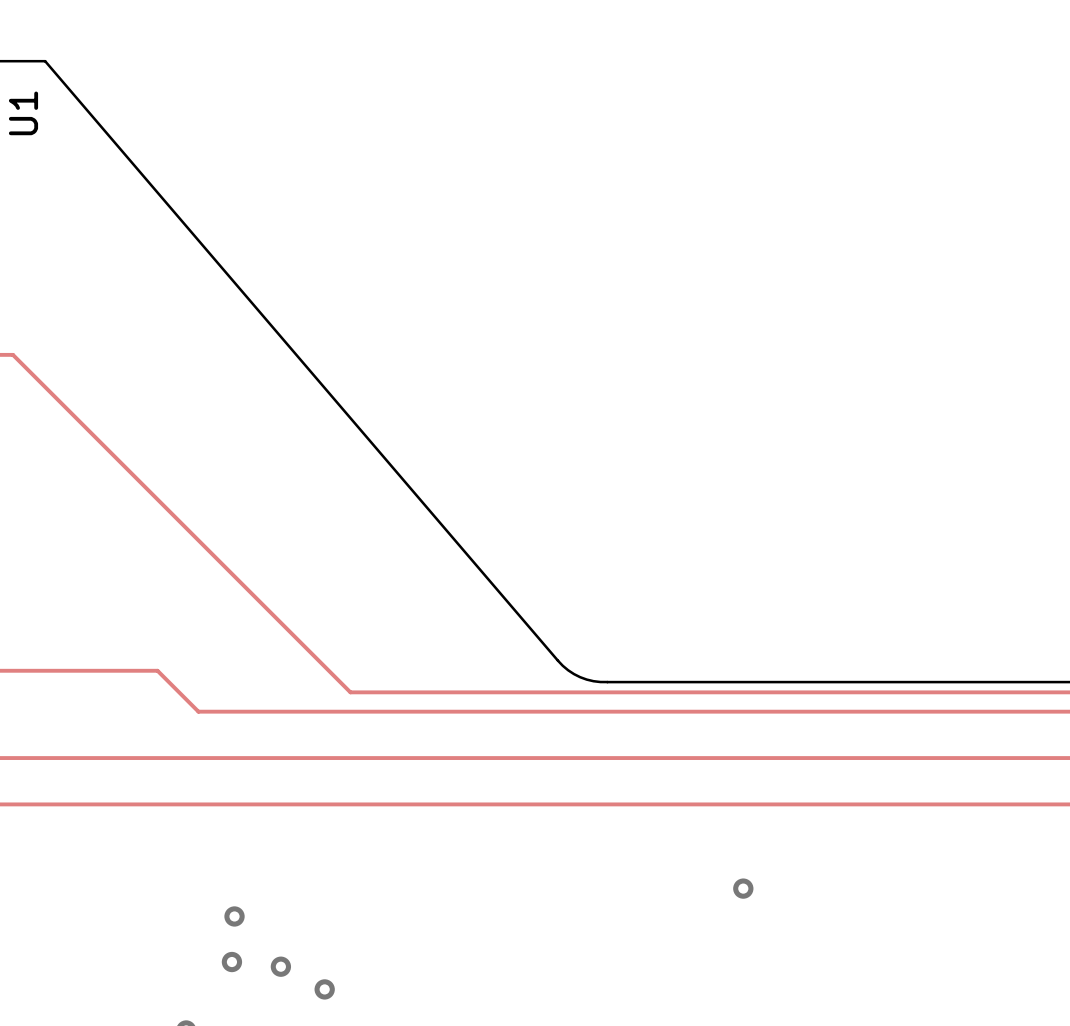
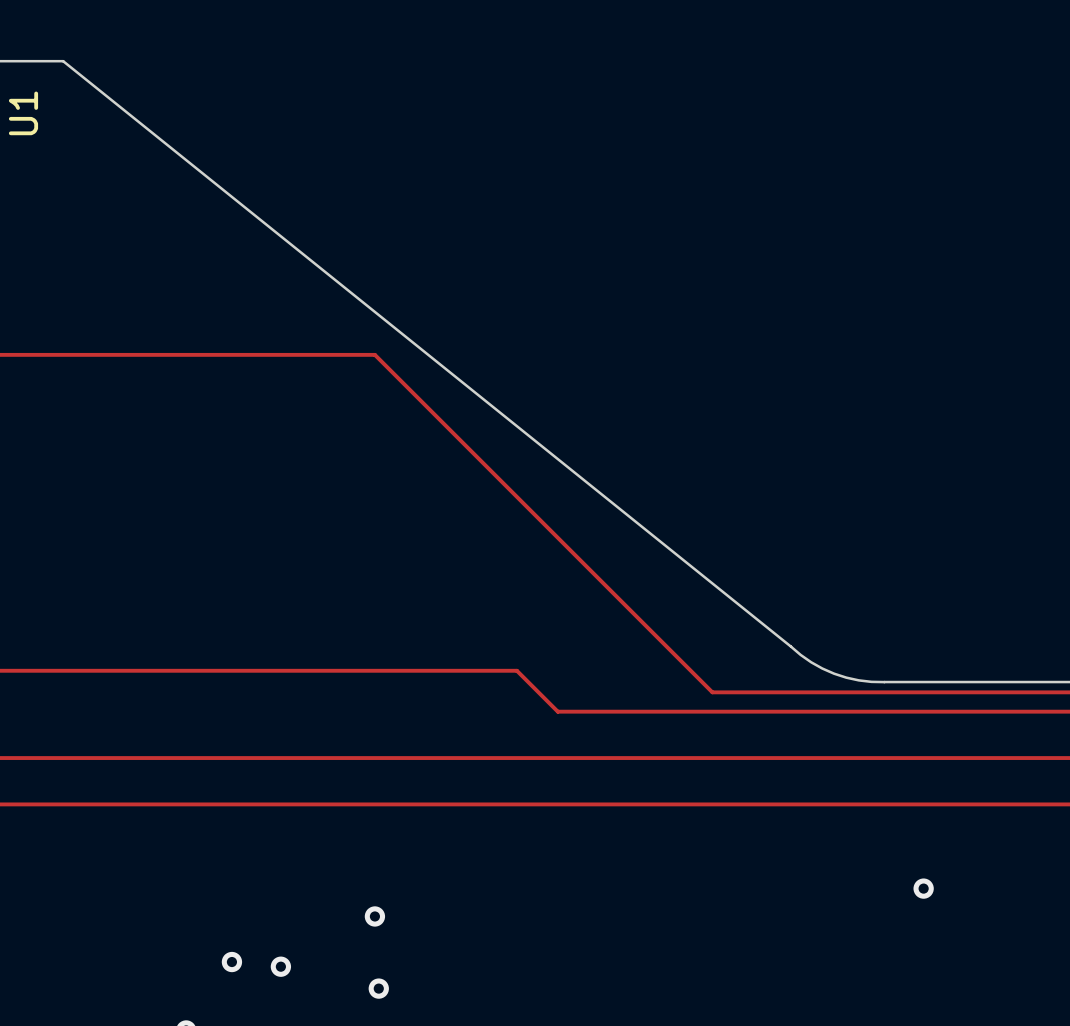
board edge: (45, 61) (558, 660) (568, 670) (586, 679) (600, 682) (884, 682) -> (45, 61) (63, 61) (800, 654) (834, 673) (858, 680) (884, 682)
track: (12, 354) (350, 692) (712, 692) -> (12, 354) (374, 354) (712, 692)
track: (157, 670) (198, 711) (557, 711) -> (157, 670) (516, 670) (557, 711)
via: (743, 888) -> none
via: none -> (923, 888)
via: (234, 916) -> none
via: none -> (374, 916)
via: none -> (378, 988)
via: (324, 989) -> none

